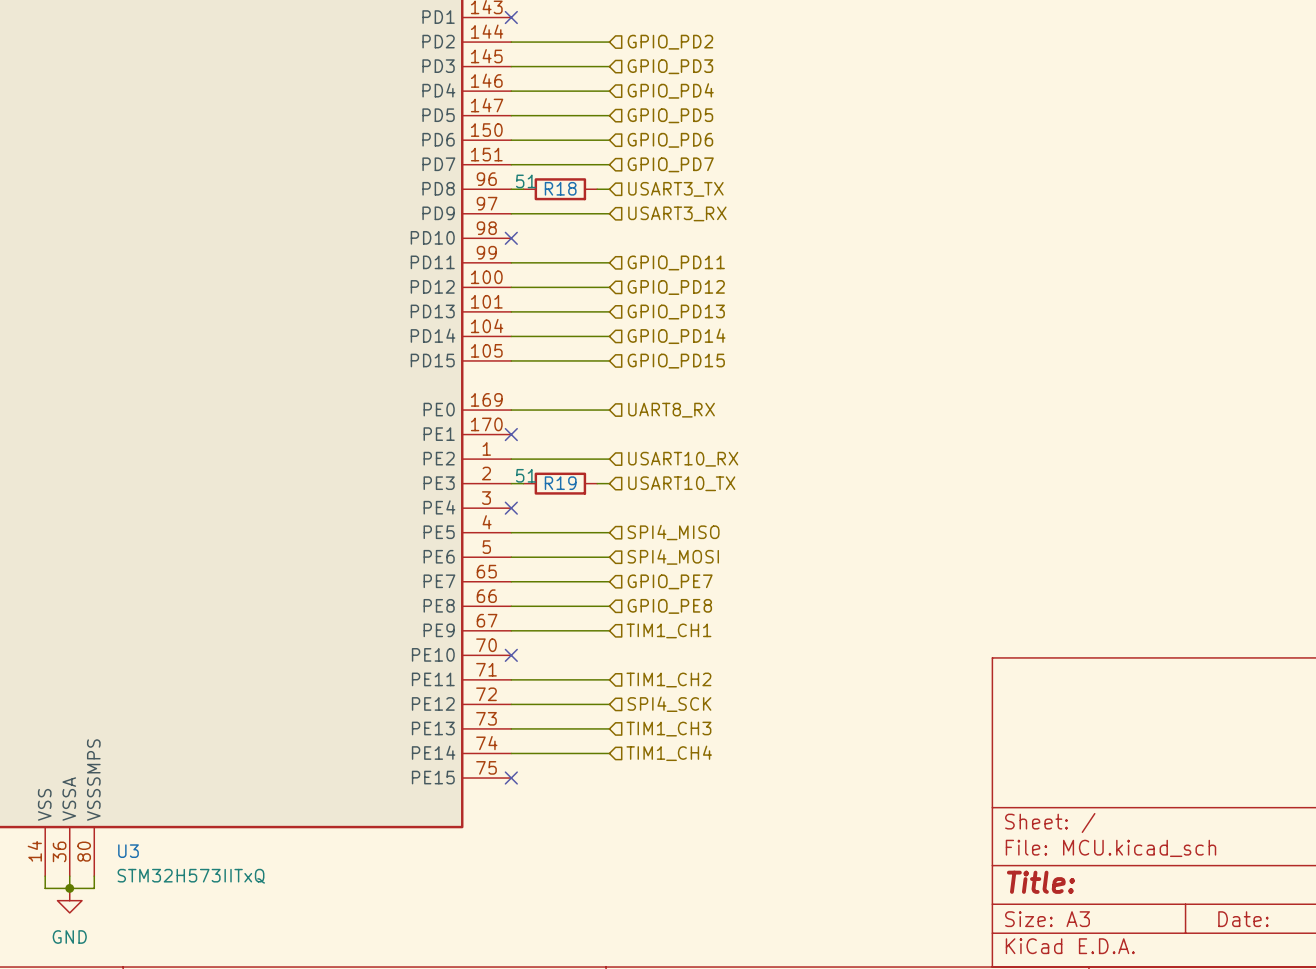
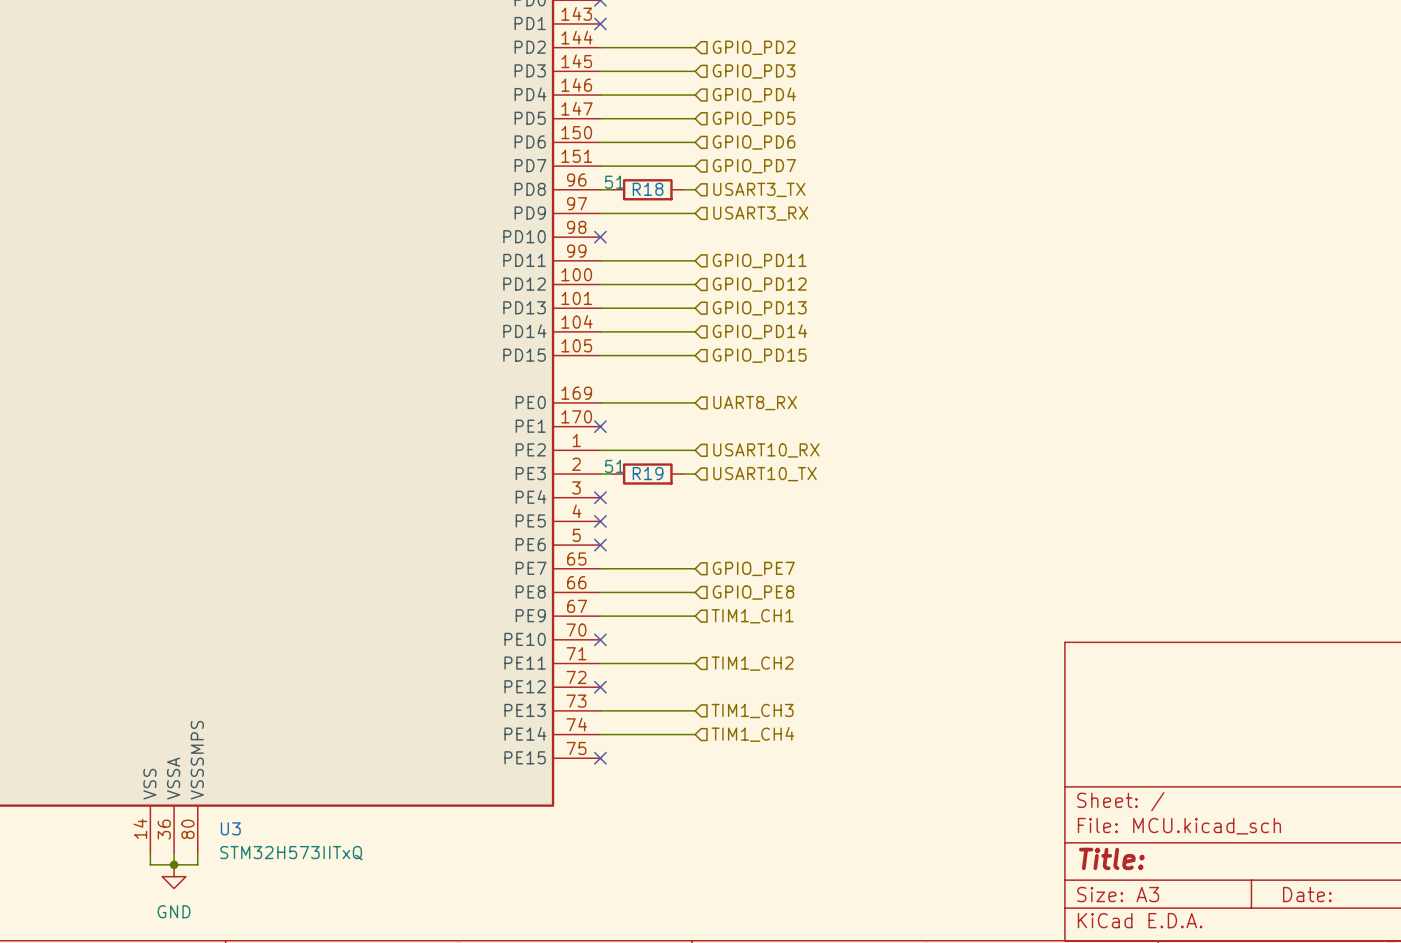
wire: (511, 532) (609, 532) -> none
no-connect mark: none -> (600, 521)
hierarchical label: SPI4_MISO (673, 532) -> none
wire: (511, 557) (609, 557) -> none
no-connect mark: none -> (600, 545)
hierarchical label: SPI4_MOSI (673, 557) -> none
wire: (511, 704) (609, 704) -> none
no-connect mark: none -> (600, 687)
hierarchical label: SPI4_SCK (669, 704) -> none

